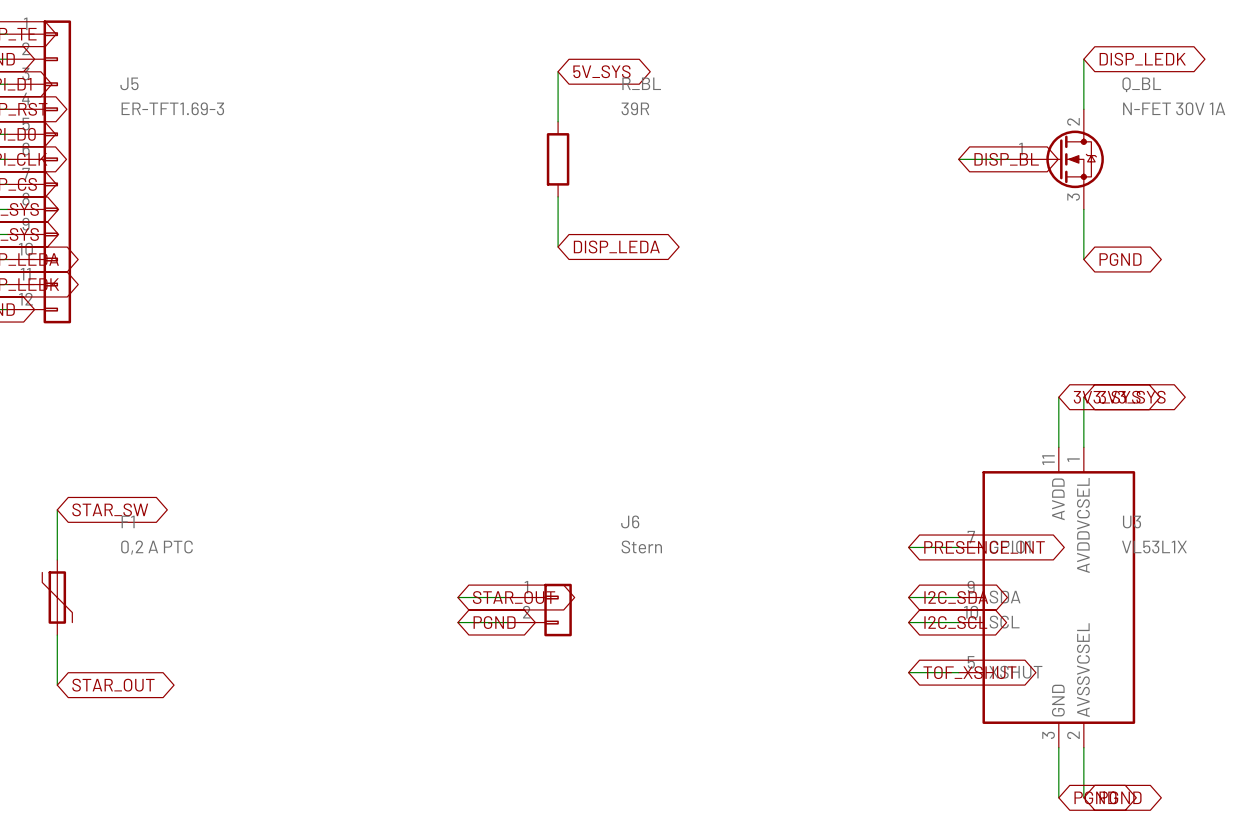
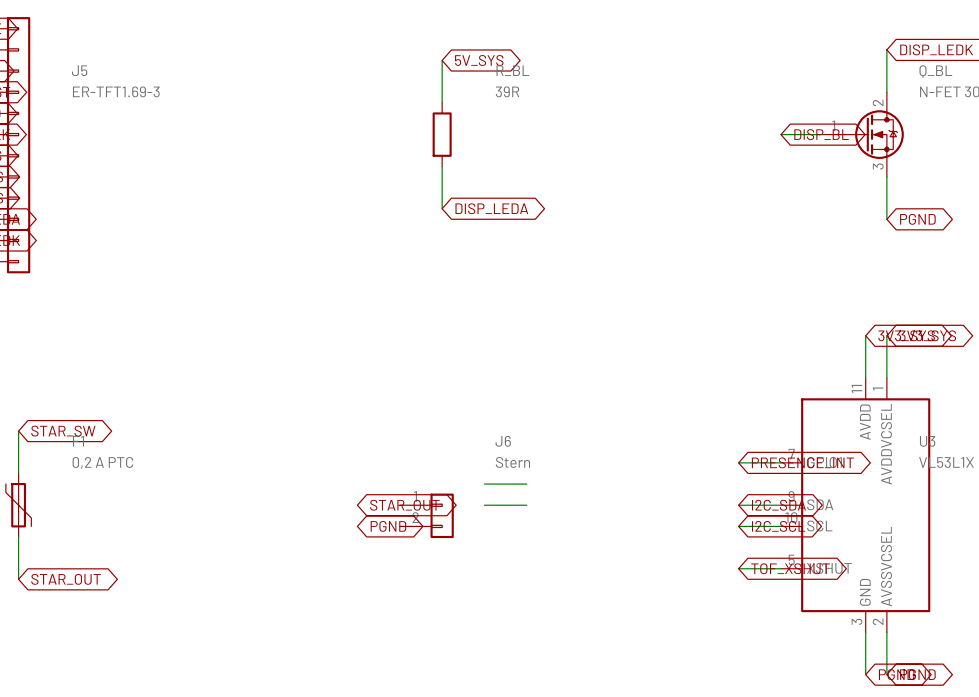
wire: (457, 597) (507, 597) -> (484, 484) (526, 484)
wire: (457, 622) (507, 622) -> (484, 505) (526, 505)

